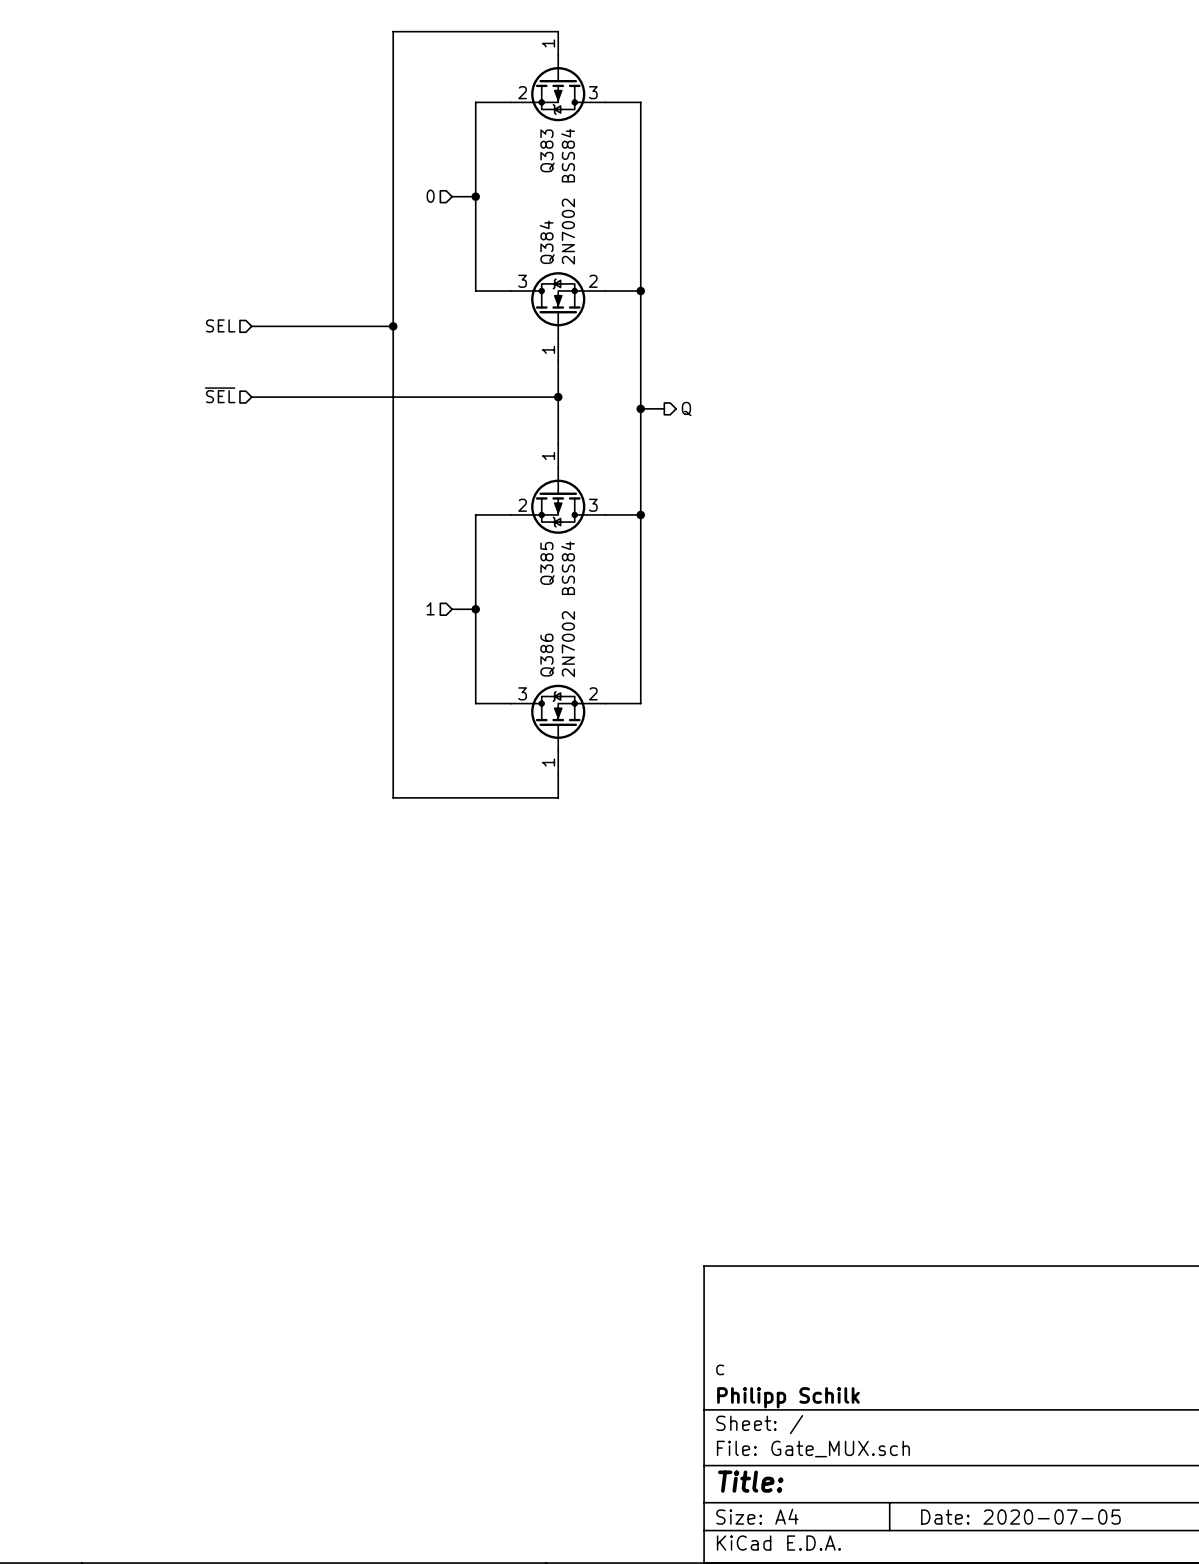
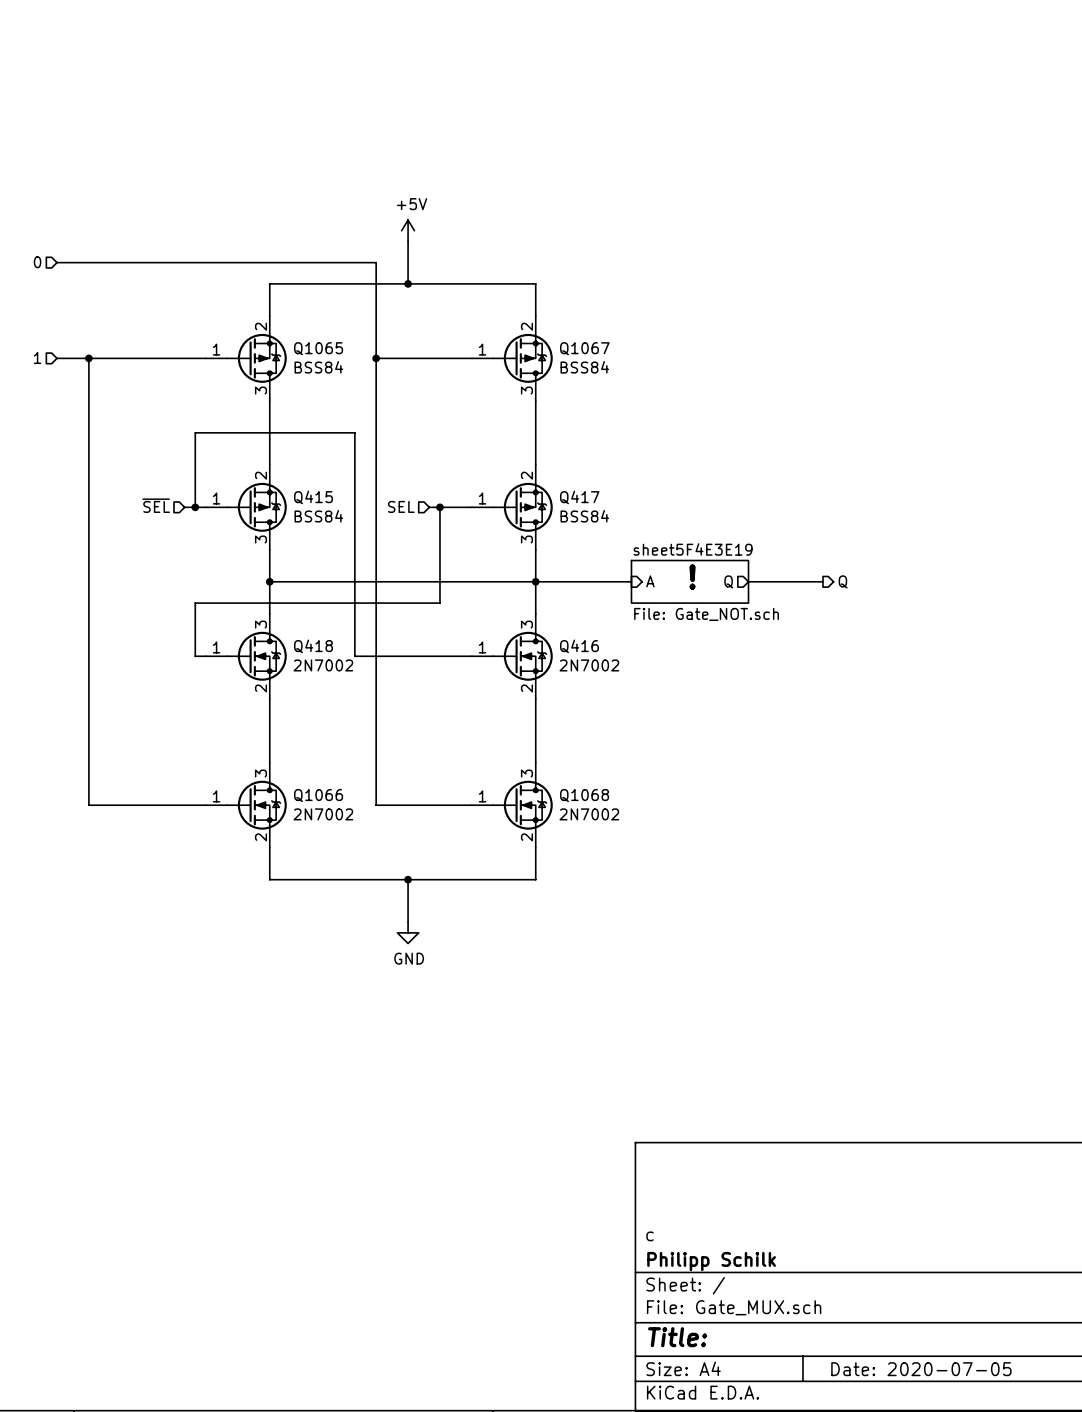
wire: (558, 31) (393, 31) (393, 479) -> (195, 507) (195, 432) (354, 432)
Q383: BSS84 (558, 76) -> none
wire: (511, 102) (475, 102) (475, 291) (511, 291) -> none
wire: (605, 102) (640, 102) (640, 703) (605, 703) -> none
hierarchical label: 0 (430, 196) -> none
wire: (452, 196) (475, 196) -> none
junction: (475, 196) -> none
power symbol: none -> +5V (408, 230)
wire: none -> (408, 241) (408, 283)
hierarchical label: none -> 0 (37, 262)
wire: none -> (56, 262) (376, 262) (376, 805) (471, 805)
wire: (605, 291) (640, 291) -> none
junction: (640, 291) -> none
junction: none -> (408, 283)
Q384: 2N7002 (558, 316) -> none
hierarchical label: SEL (220, 325) -> none
wire: (251, 326) (393, 326) -> none
junction: (393, 326) -> none
wire: none -> (269, 315) (269, 283) (535, 283) (535, 315)
wire: (558, 361) (558, 444) -> none
hierarchical label position: ~{SEL} (220, 395) -> ~{SEL} (156, 505)
hierarchical label: none -> 1 (37, 357)
wire: none -> (88, 358) (88, 805) (205, 805)
junction: none -> (88, 358)
wire: (251, 397) (416, 397) -> (56, 358) (205, 358)
Q1065: none -> BSS84 (246, 358)
junction: none -> (376, 358)
junction: (558, 397) -> none
Q1067: none -> BSS84 (512, 358)
wire: (640, 408) (664, 408) -> none
junction: (640, 408) -> none
hierarchical label: Q (686, 409) -> none
wire: none -> (269, 400) (269, 464)
wire: none -> (535, 400) (535, 464)
Q385: BSS84 (558, 489) -> none
wire: (511, 514) (475, 514) (475, 703) (511, 703) -> none
wire: (605, 514) (640, 514) -> none
junction: (640, 514) -> none
hierarchical label: none -> SEL (401, 506)
wire: none -> (184, 507) (205, 507)
junction: none -> (195, 507)
Q415: none -> BSS84 (246, 507)
wire: none -> (429, 507) (471, 507)
wire: none -> (439, 507) (439, 603) (195, 603) (195, 656) (205, 656)
Q417: none -> BSS84 (512, 507)
hierarchical label: 1 (430, 608) -> none
wire: none -> (269, 549) (269, 613)
wire: (452, 609) (475, 609) -> none
junction position: (475, 609) -> (439, 507)
wire: none -> (535, 549) (535, 613)
text: none -> ! (692, 577)
wire: none -> (269, 581) (631, 581)
junction: none -> (269, 581)
junction: none -> (535, 581)
sheet pin: none -> A (650, 581)
sheet sheet5F4E3E19: none -> File: Gate_NOT.sch (689, 581)
sheet pin: none -> Q (728, 581)
wire: none -> (748, 581) (822, 581)
hierarchical label: none -> Q (843, 581)
Q418: none -> 2N7002 (246, 656)
wire: (393, 727) (393, 797) (558, 797) (558, 774) -> (354, 656) (471, 656)
Q416: none -> 2N7002 (512, 656)
Q386: 2N7002 (558, 729) -> none
wire: none -> (269, 698) (269, 762)
wire: none -> (535, 698) (535, 762)
Q1066: none -> 2N7002 (246, 805)
Q1068: none -> 2N7002 (512, 805)
wire: none -> (269, 847) (269, 879) (535, 879) (535, 847)
wire: none -> (408, 879) (408, 922)
junction: none -> (408, 879)
power symbol: none -> GND (408, 932)

